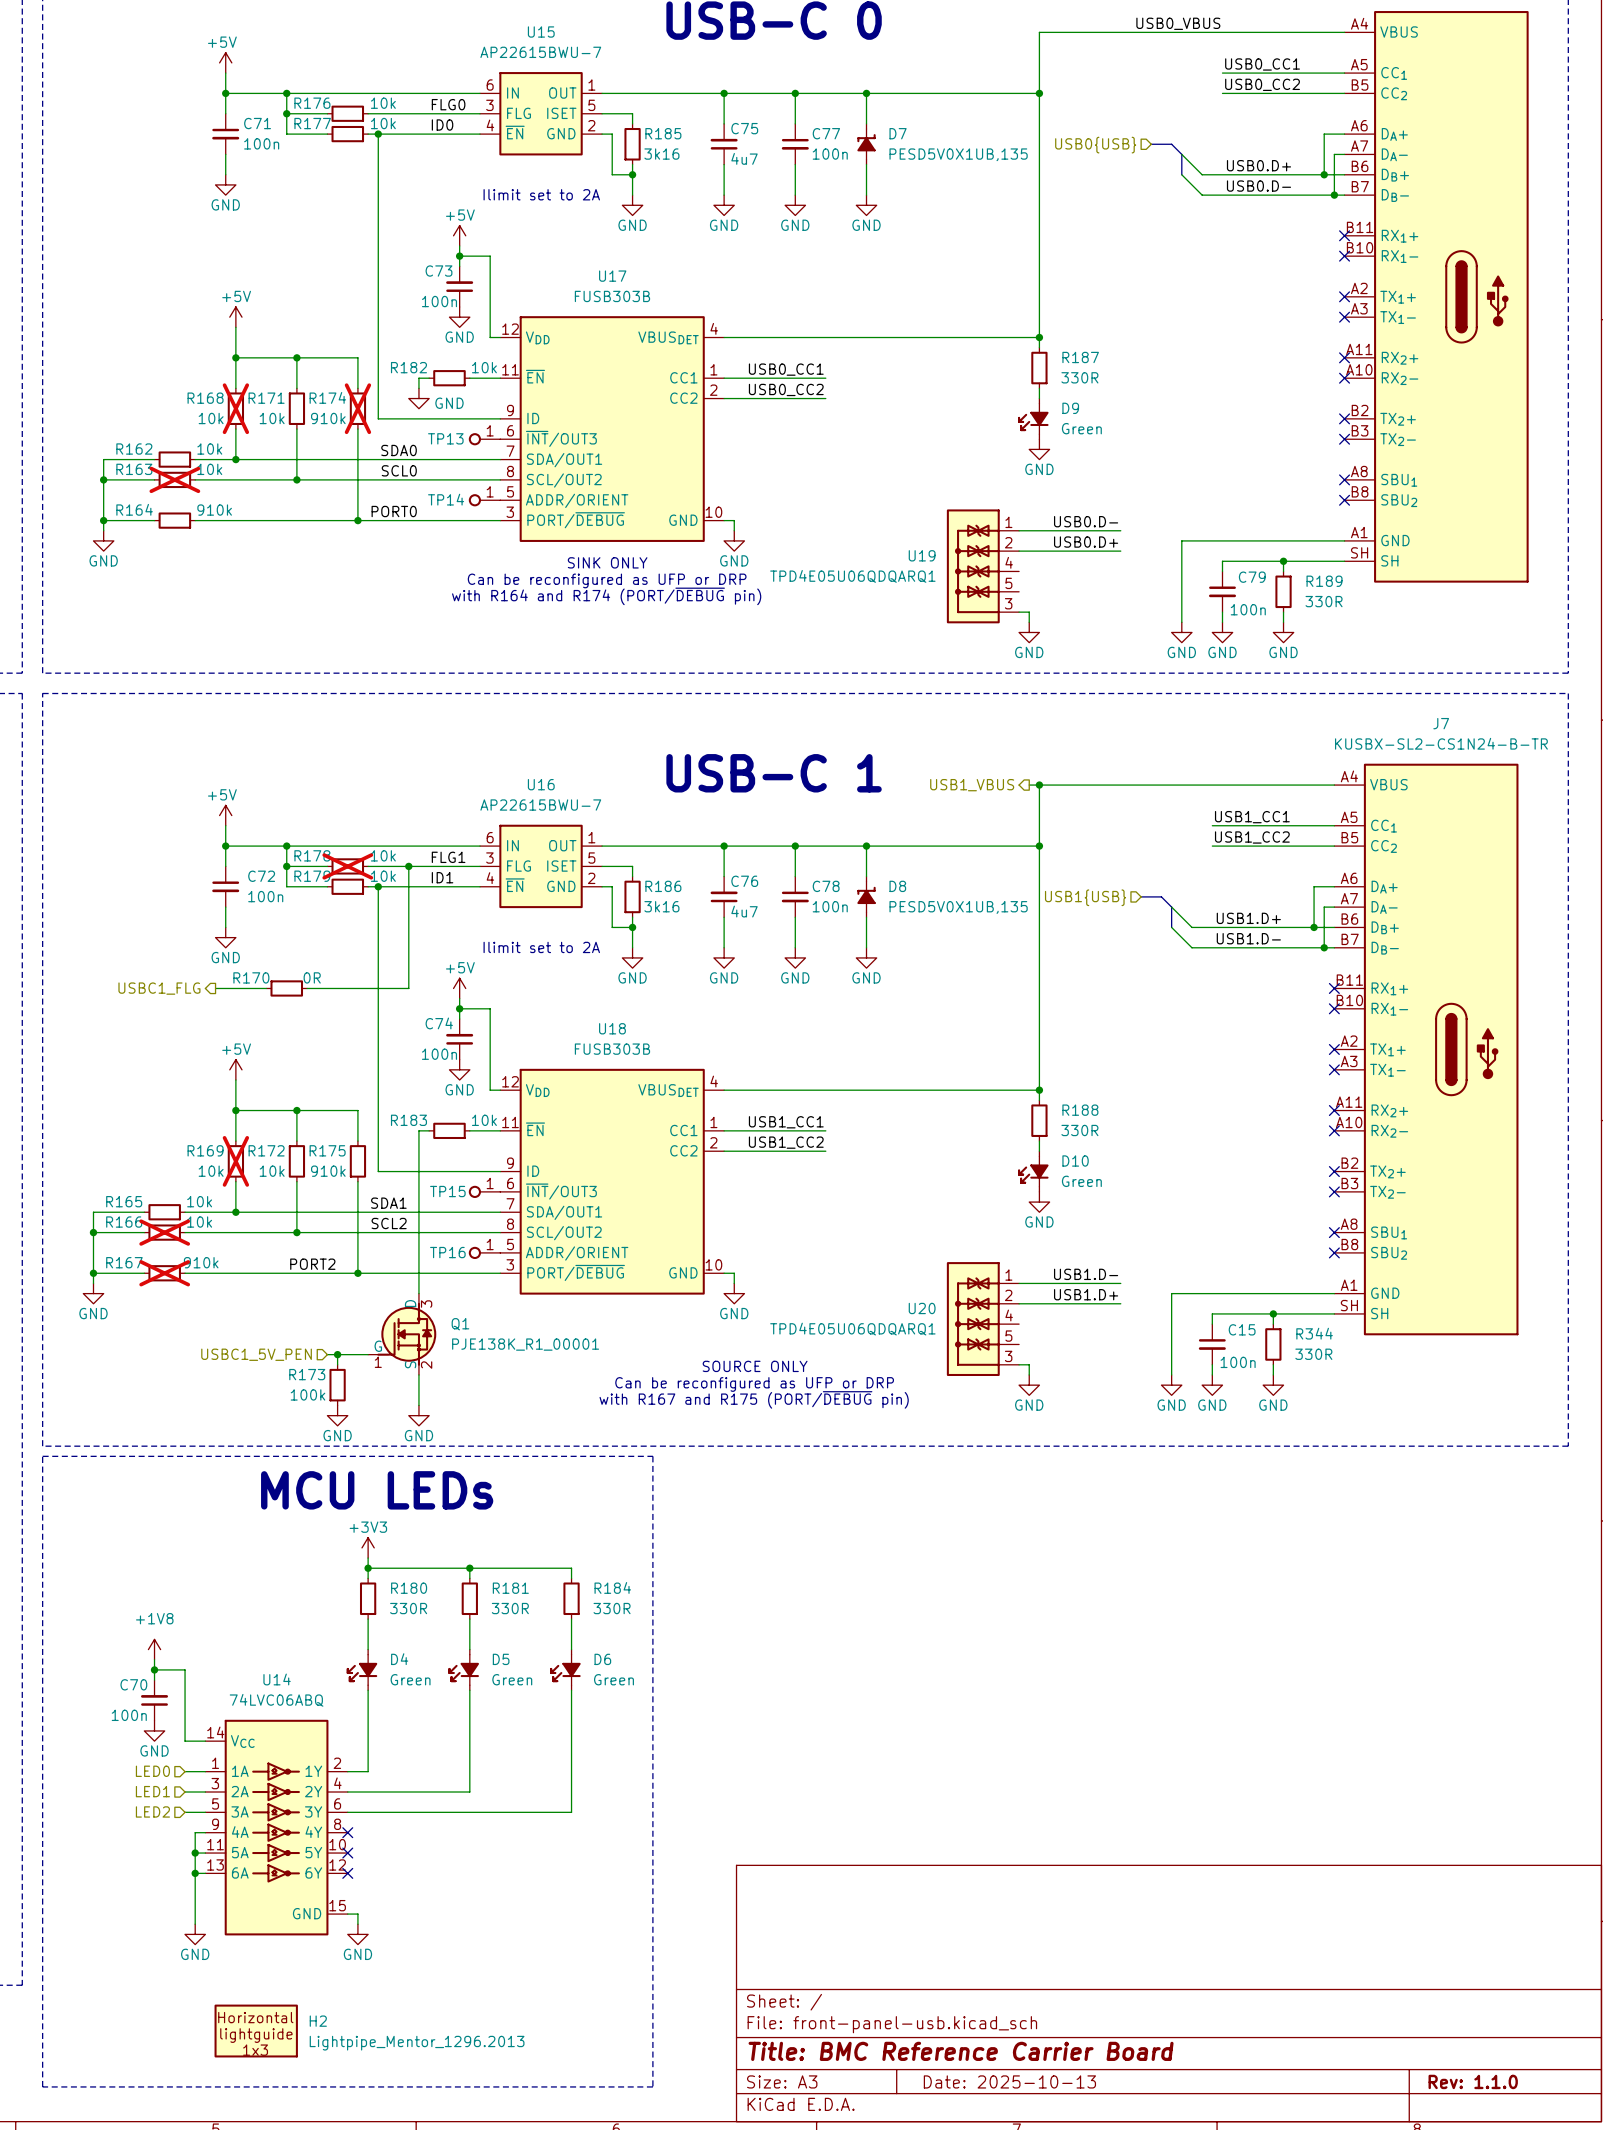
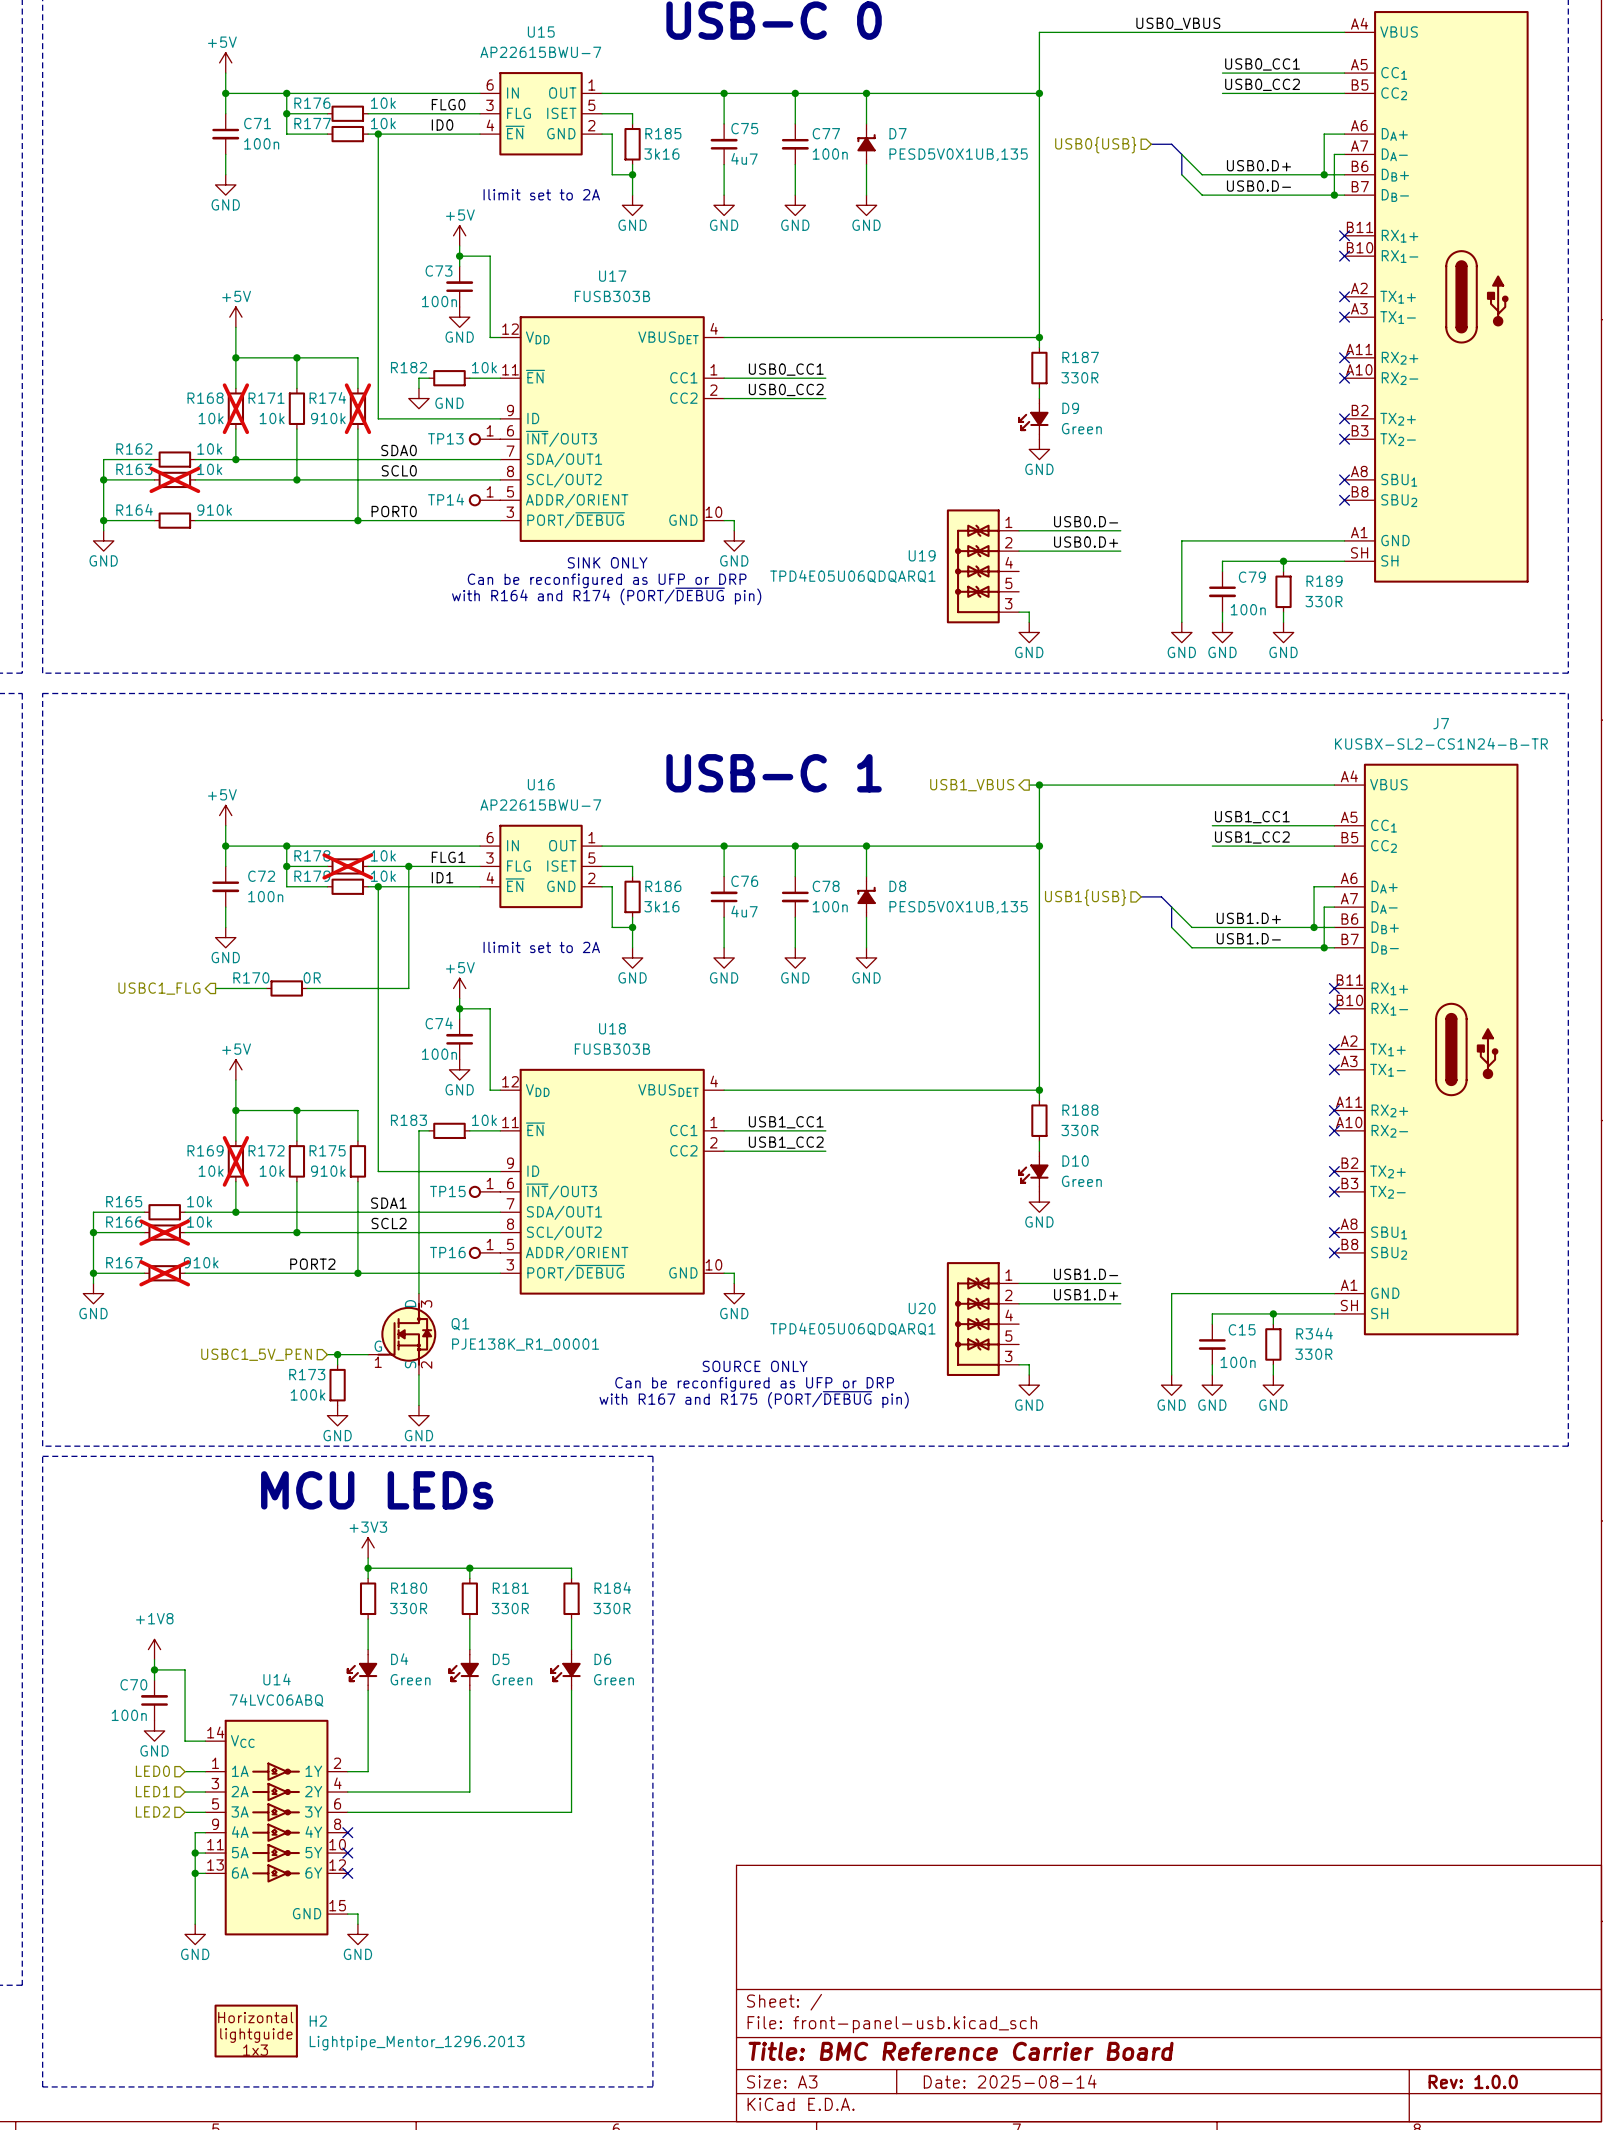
title block: Date: 2025-10-13 (1009, 2081) -> Date: 2025-08-14 (1010, 2081)
title block: Rev: 1.1.0 (1473, 2081) -> Rev: 1.0.0 (1473, 2081)

